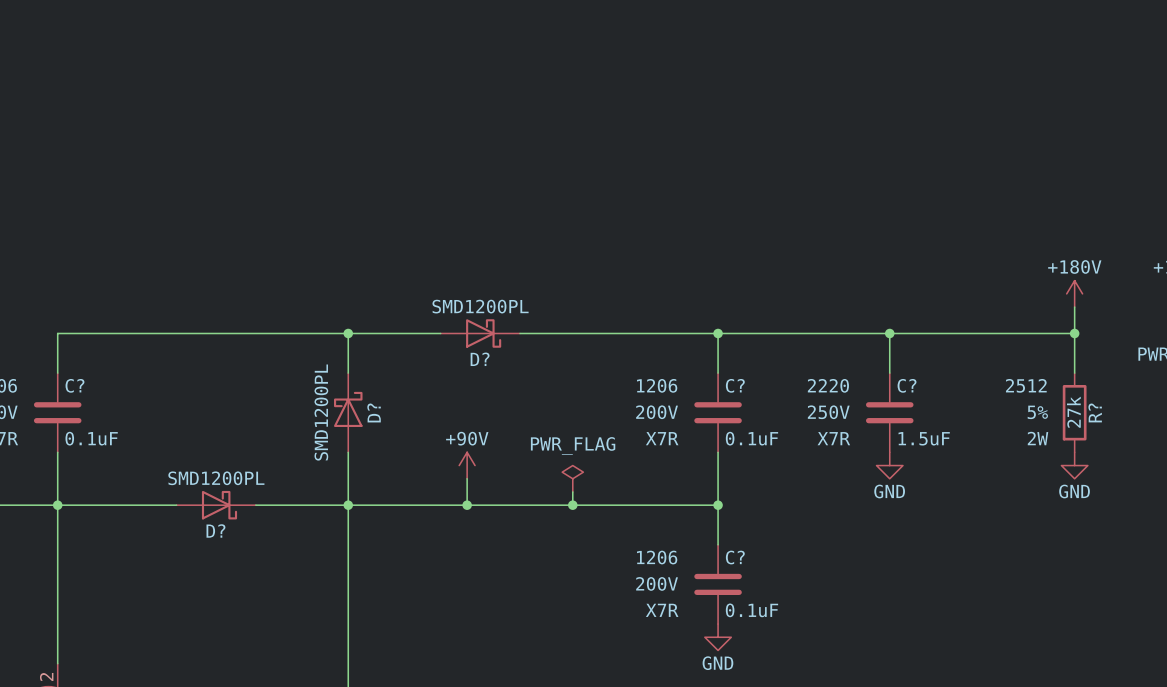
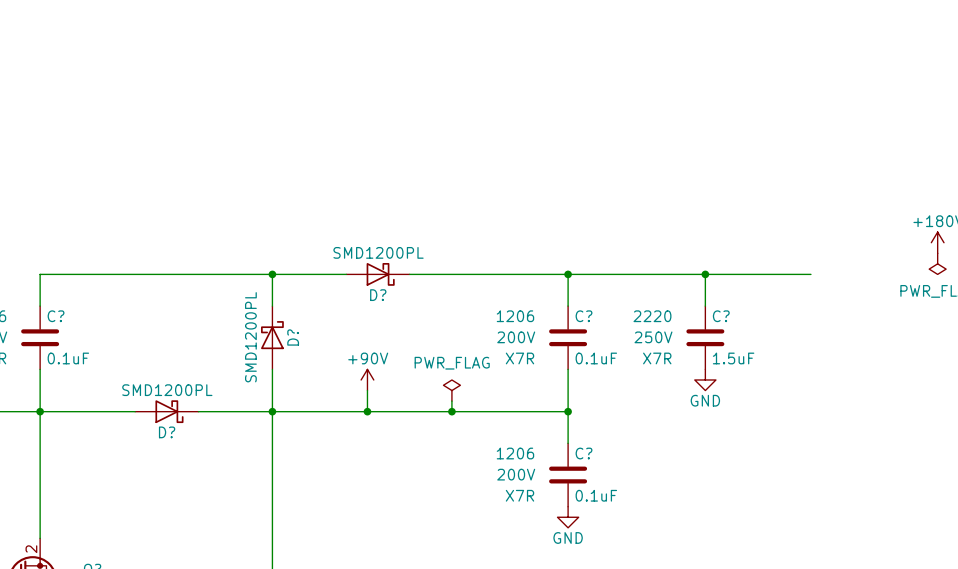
power symbol: +180V (1074, 293) -> none
wire: (1074, 307) (1074, 373) -> none
wire: (1021, 333) (1074, 333) -> none
junction: (1074, 333) -> none
R?: 27k (1074, 412) -> none
power symbol: GND (1074, 465) -> none

